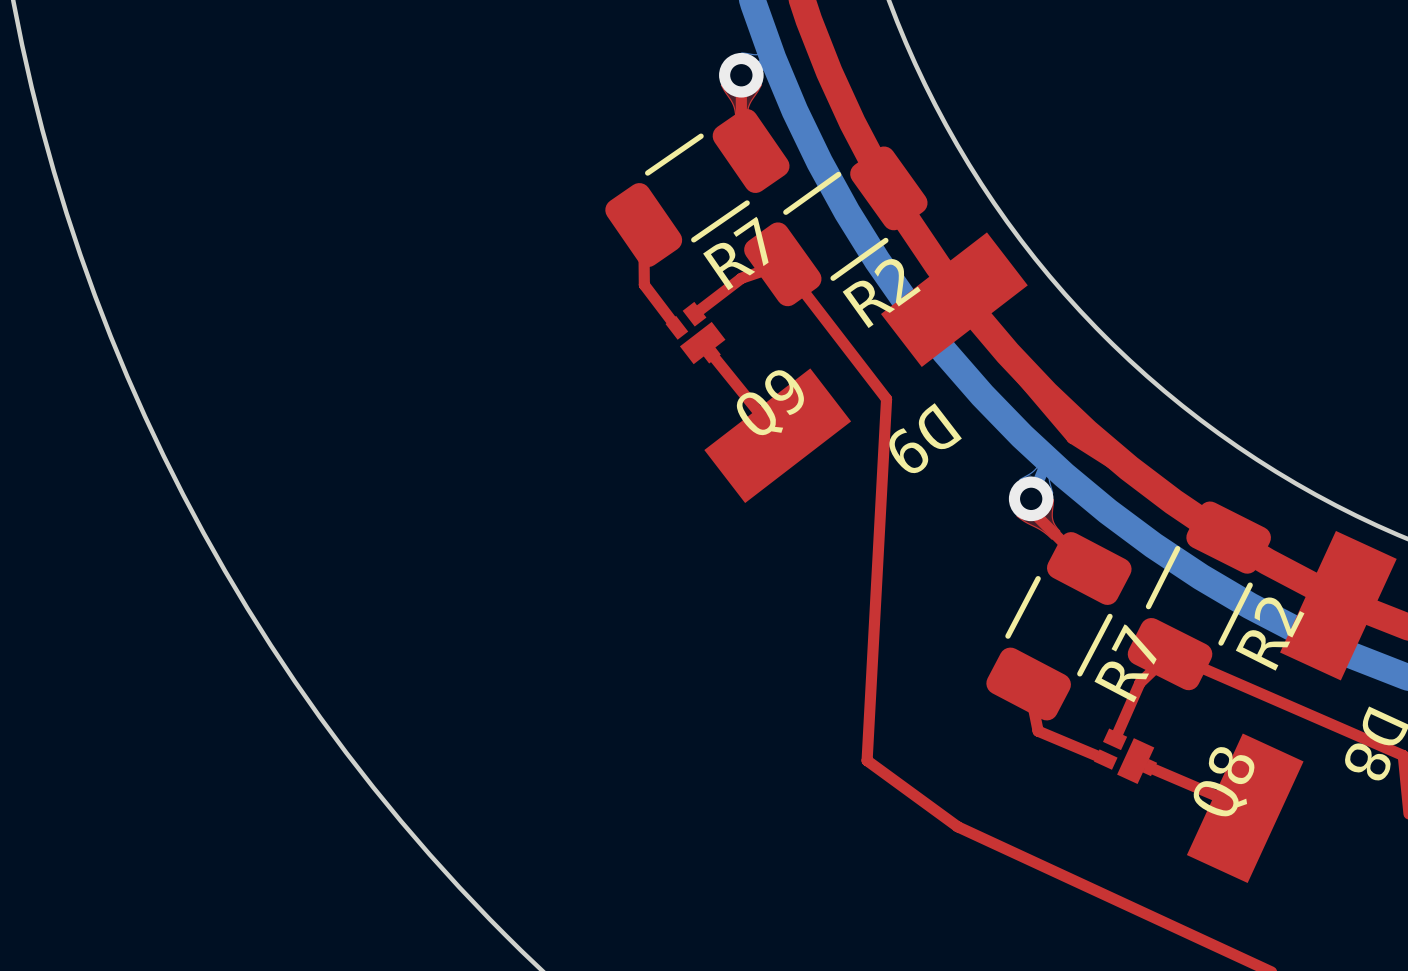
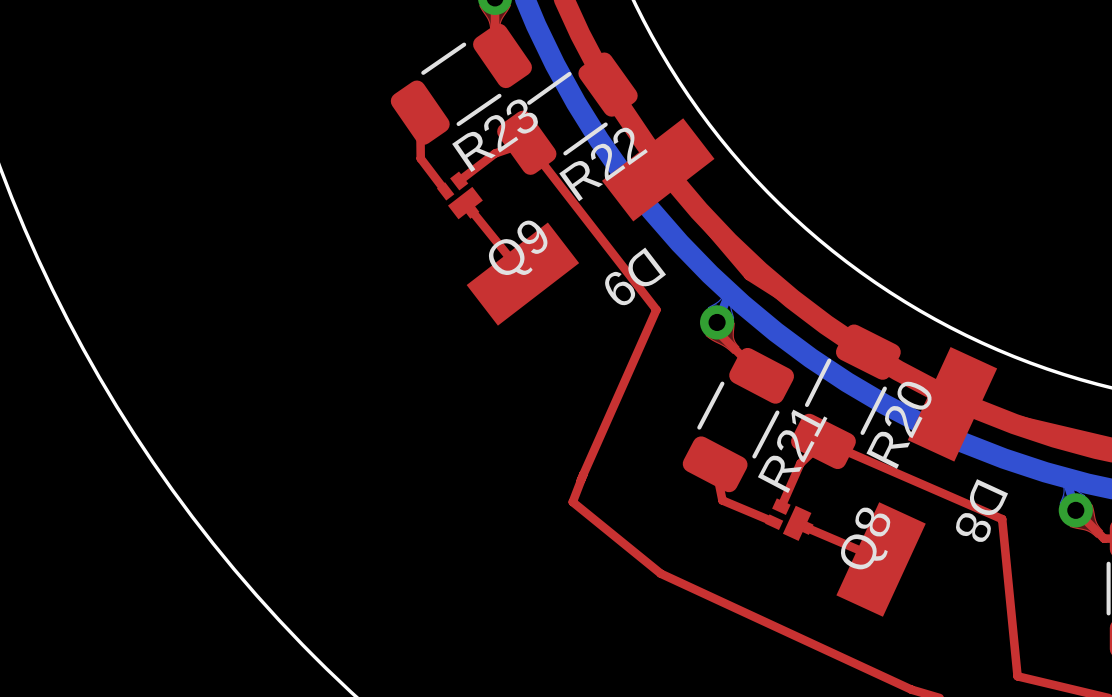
R7 name: R7 (735, 253) -> R23 (495, 135)
top track: (782, 264) (886, 399) (867, 760) (957, 826) -> (526, 142) (656, 309) (580, 480)
R2 name: R2 (881, 293) -> R22 (603, 164)
R2 name: R2 (1270, 633) -> R20 (899, 425)
R7 name: R7 (1125, 663) -> R21 (792, 451)
top track: none -> (583, 474) (572, 502) (660, 573)

